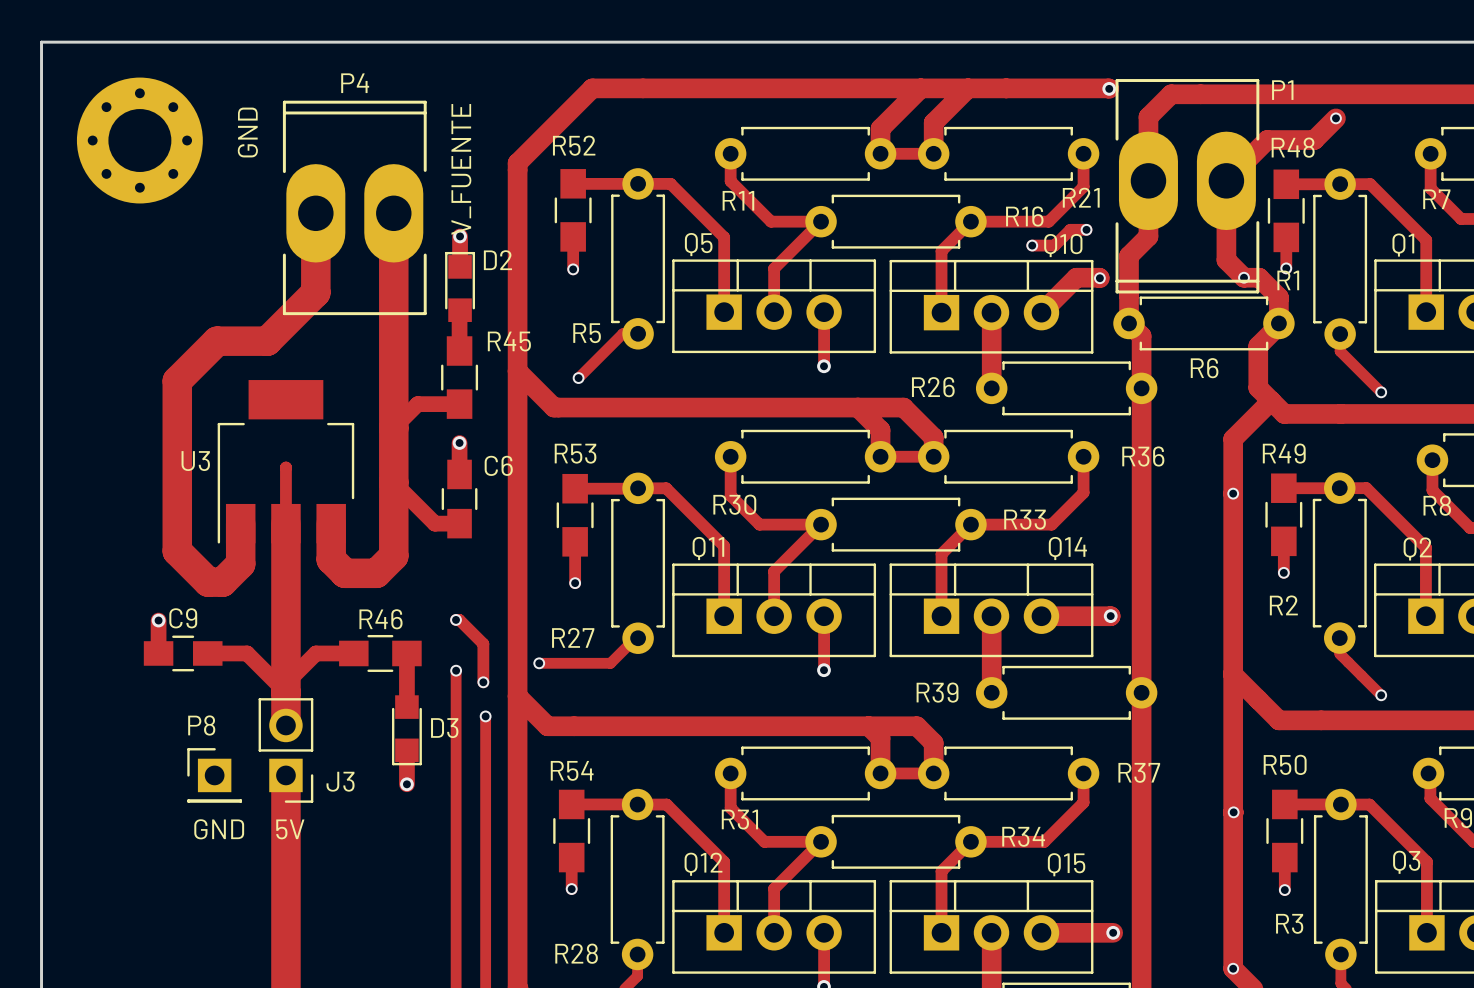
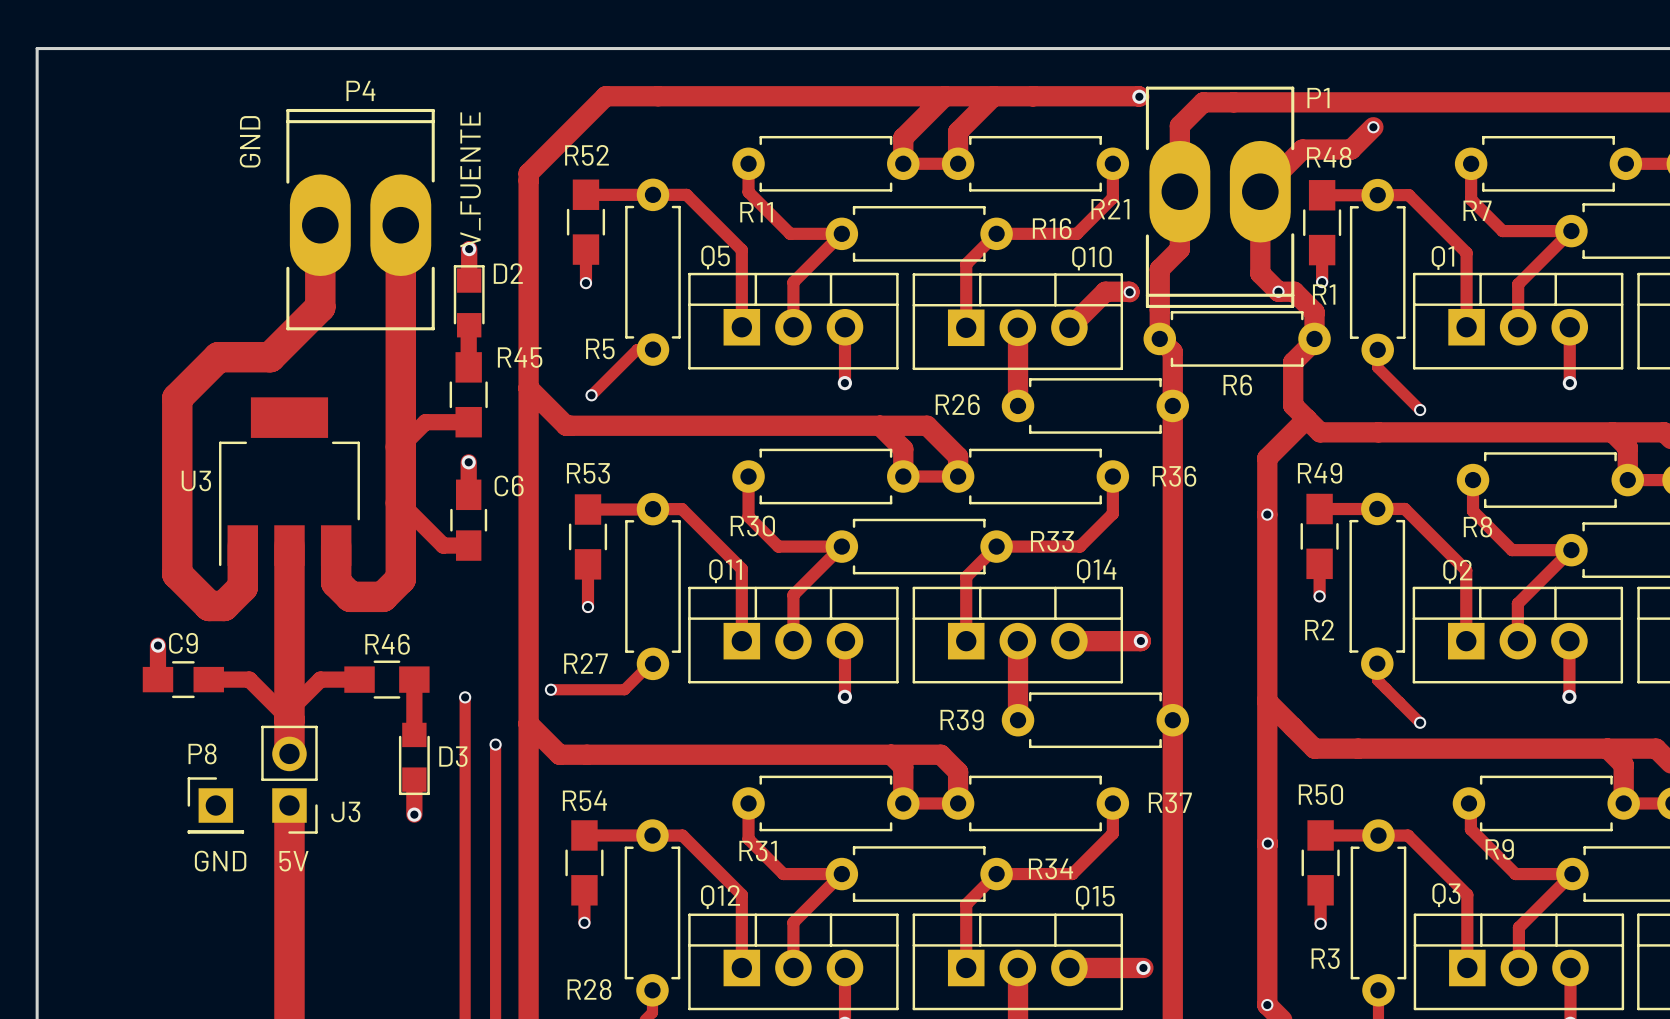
part: (139, 140) -> none
track: (1086, 229) (1070, 229) (1054, 245) (1032, 245) -> none
via: (1086, 229) -> none
via: (1032, 245) -> none
track: (285, 467) (285, 523) -> none
track: (456, 619) (459, 619) (483, 643) (483, 682) -> none
via: (456, 619) -> none
via: (483, 682) -> none

